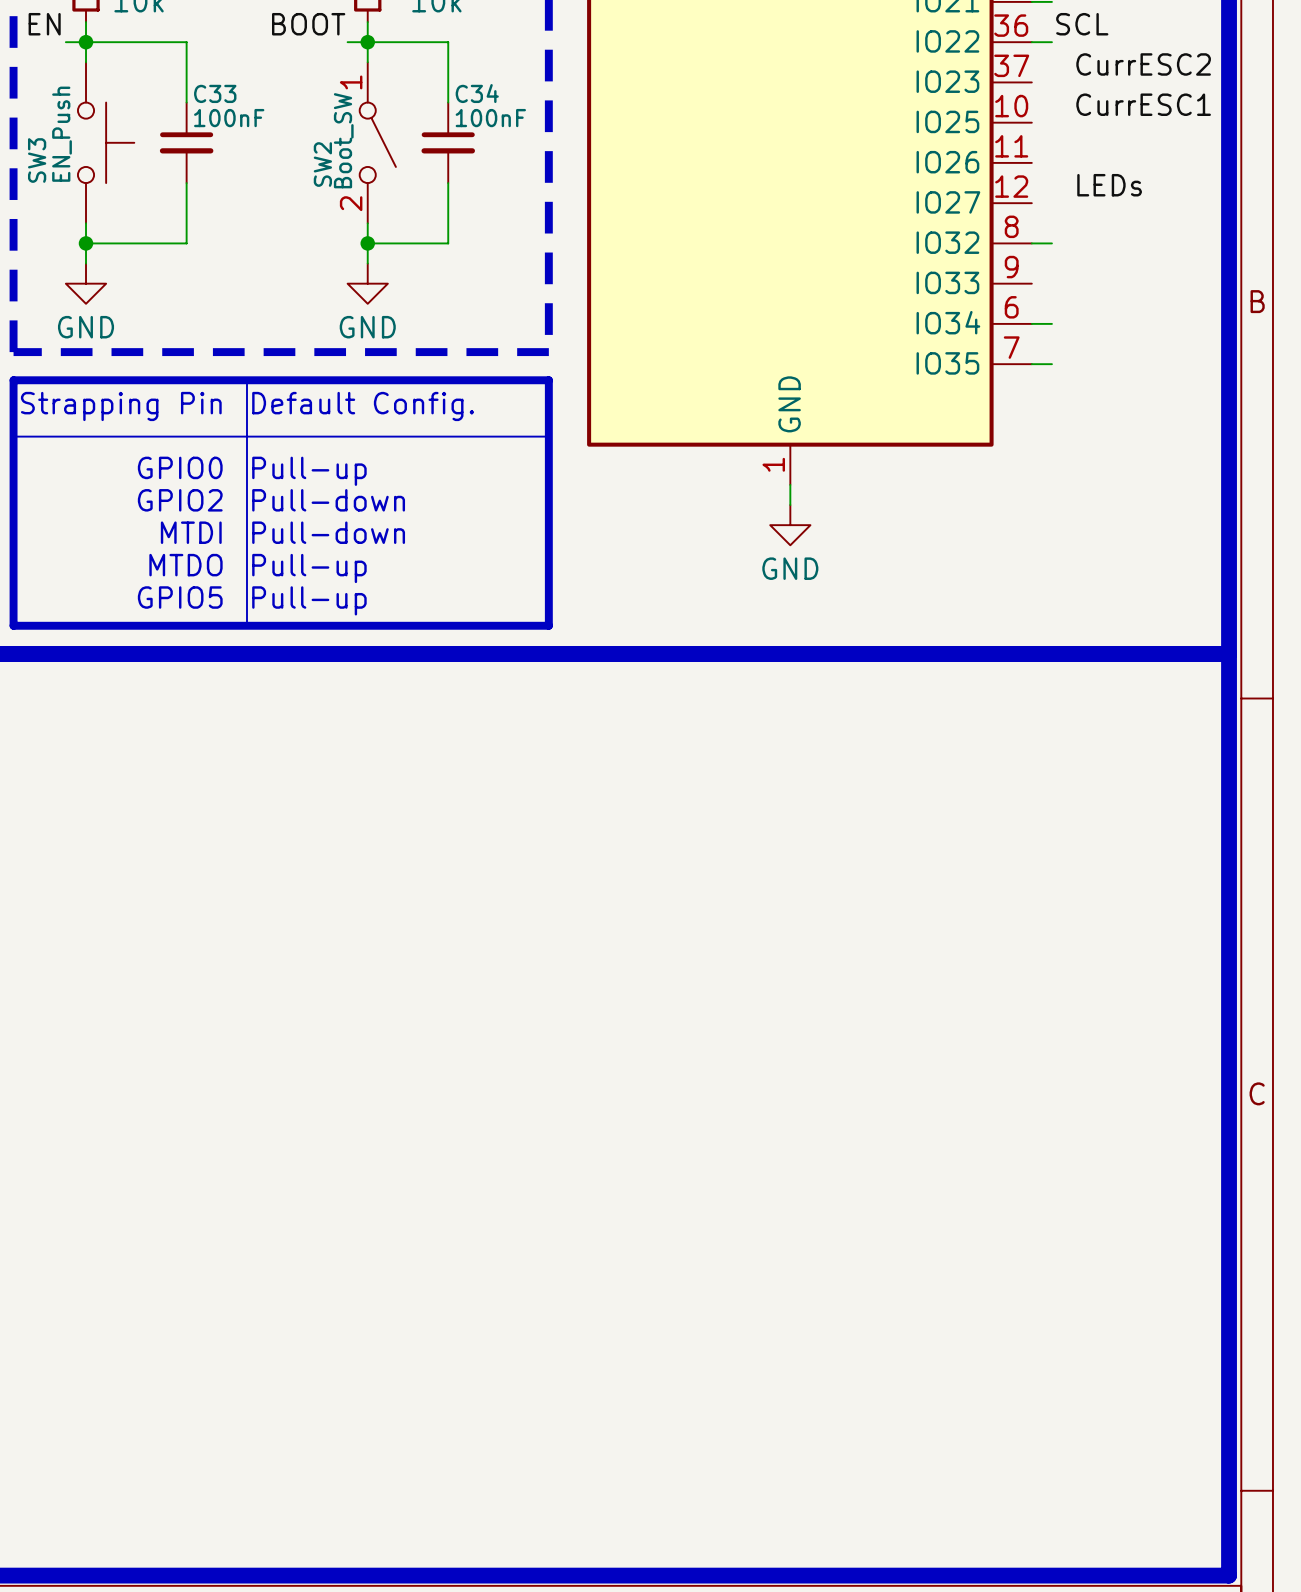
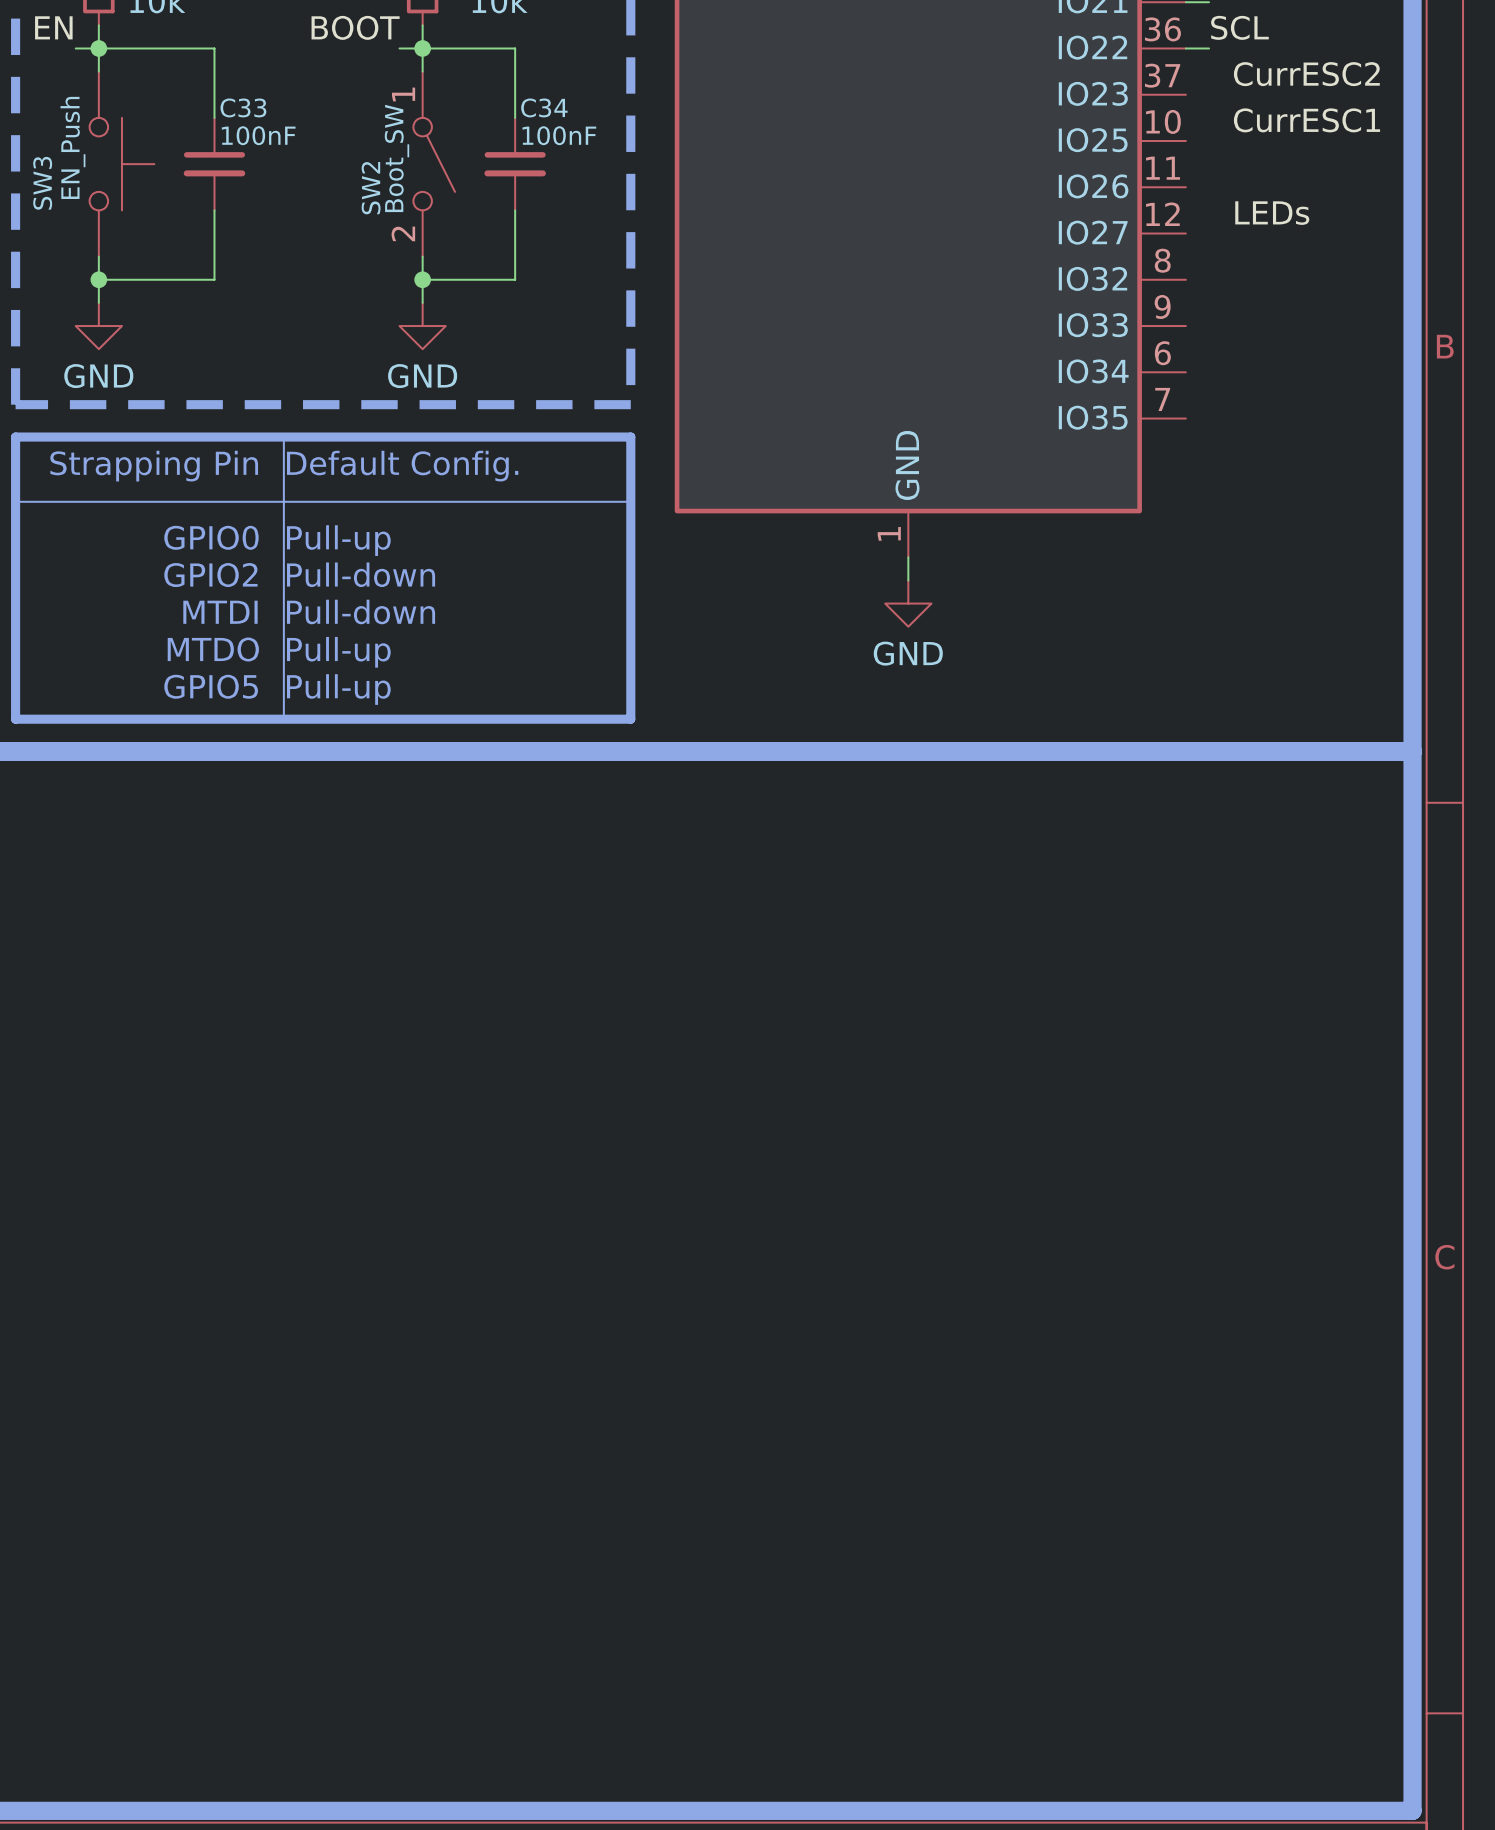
wire: (1031, 243) (1051, 243) -> none
wire: (1031, 323) (1051, 323) -> none
wire: (1031, 364) (1051, 364) -> none

